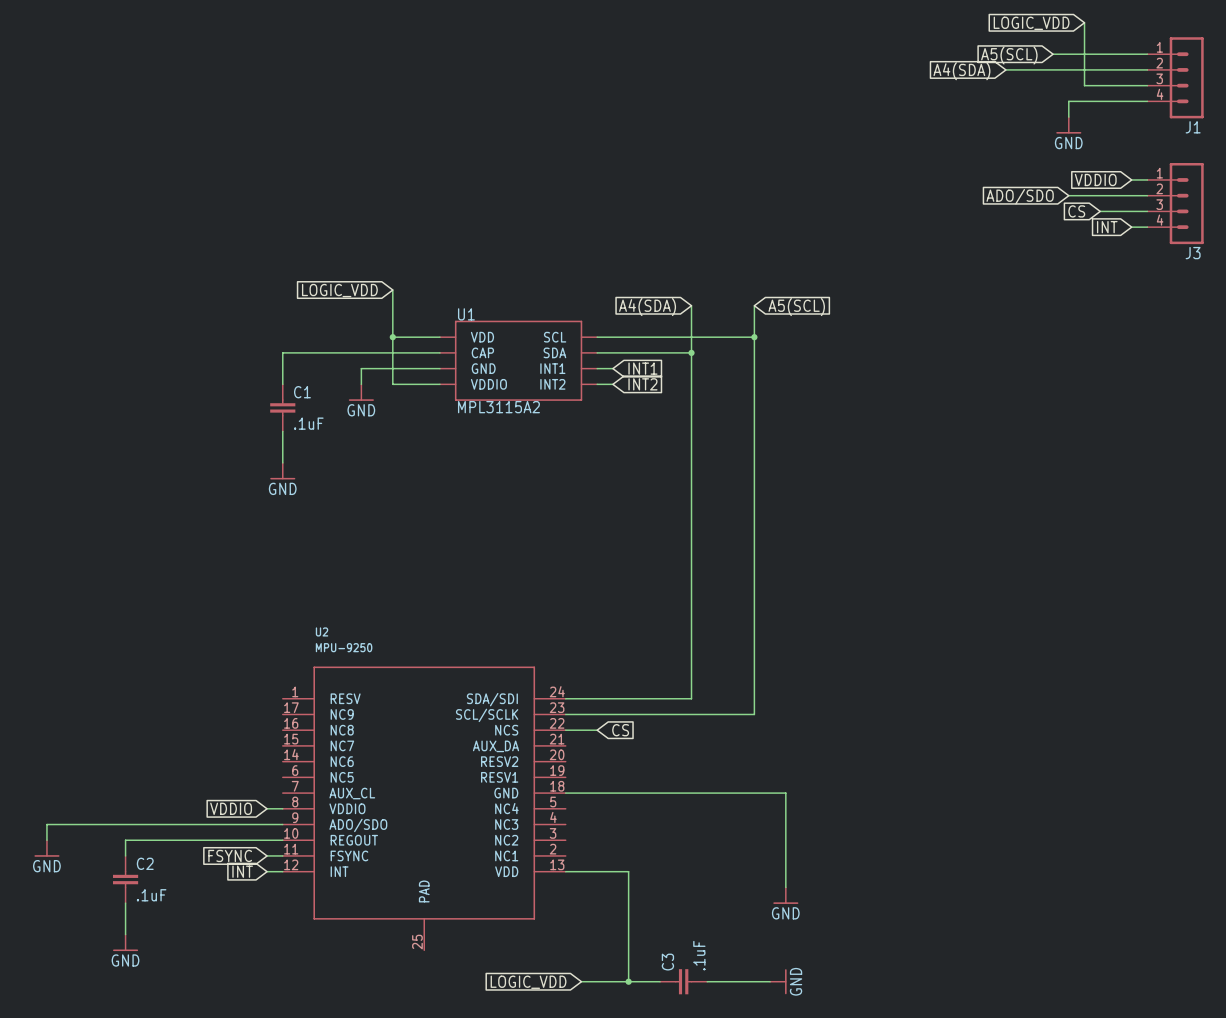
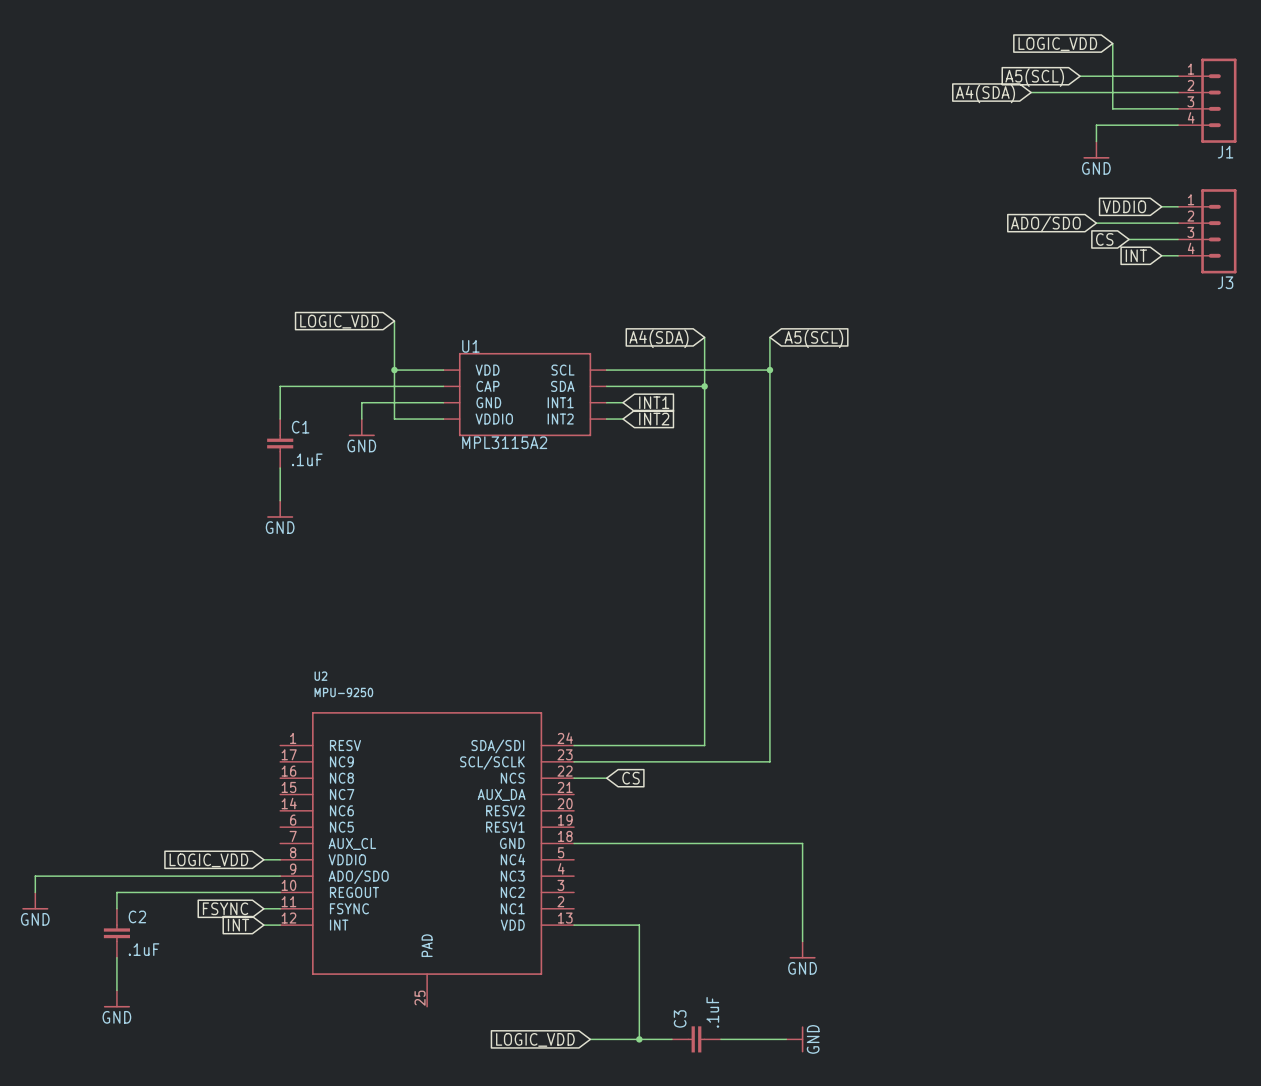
global label: VDDIO (231, 808) -> LOGIC_VDD (208, 860)

